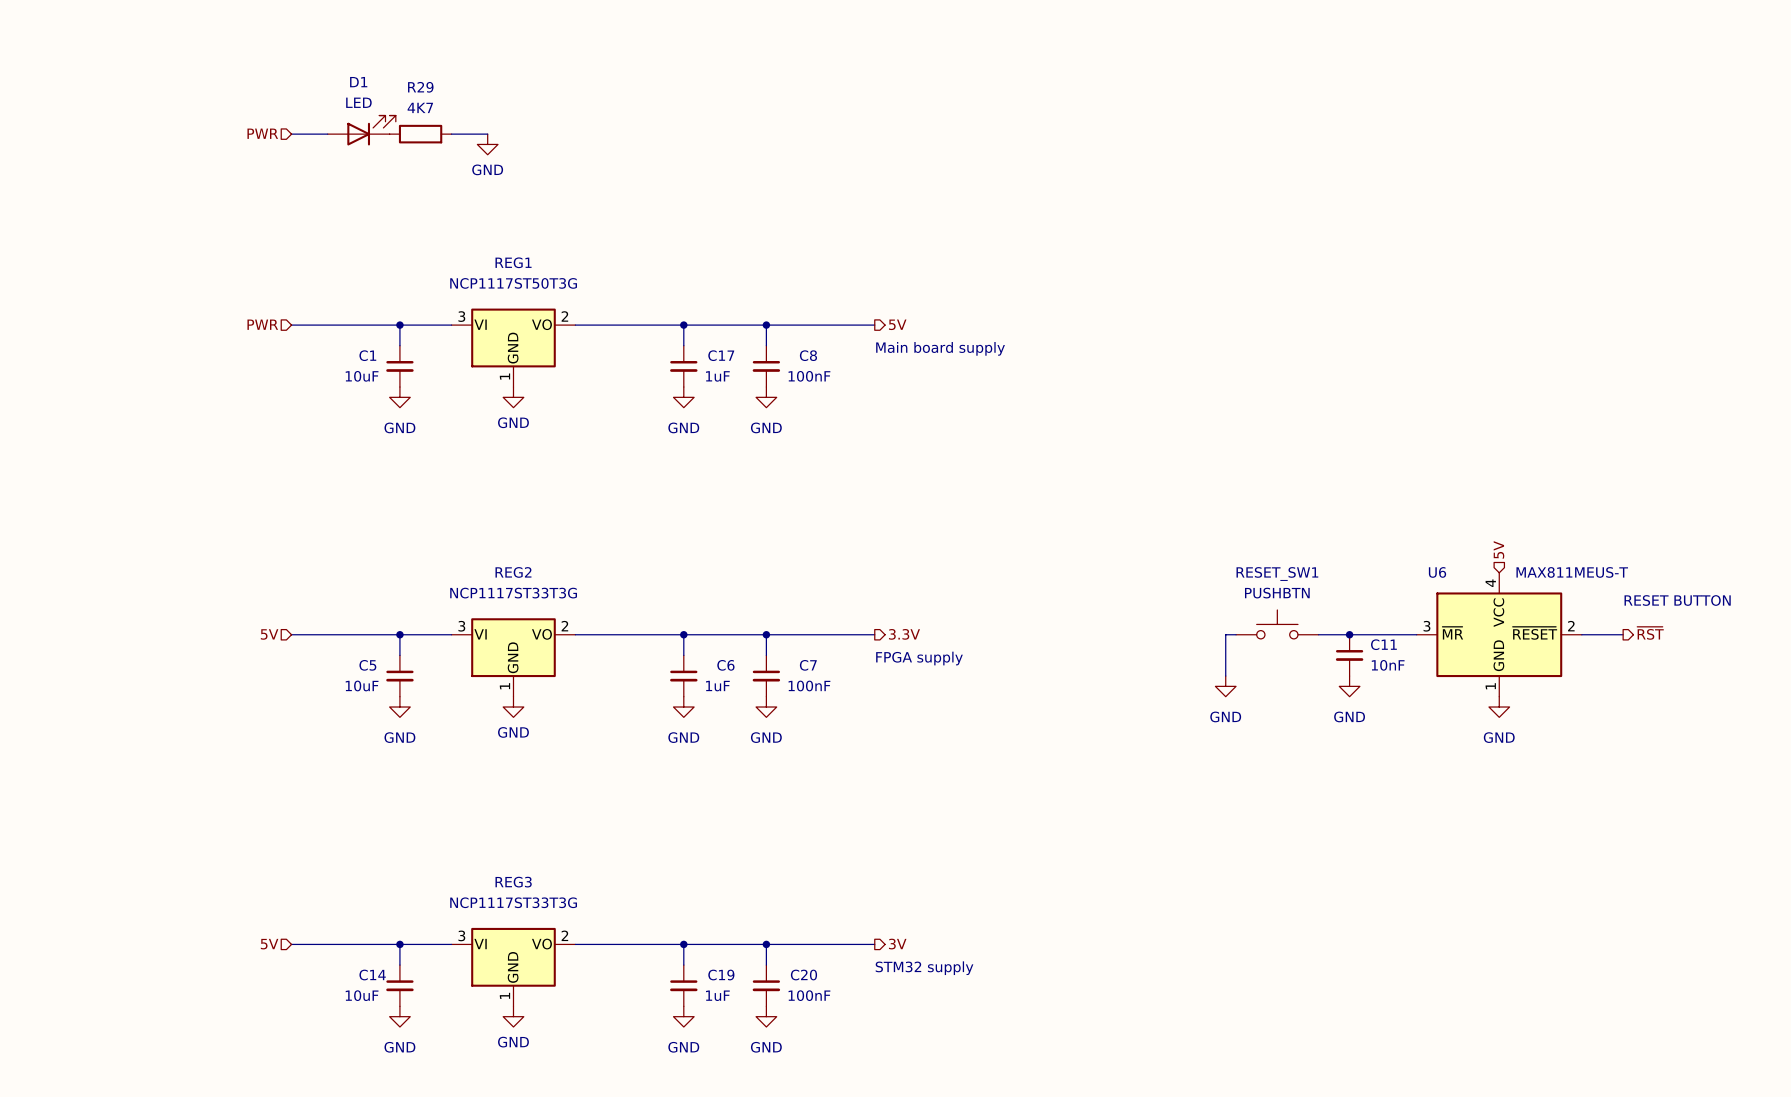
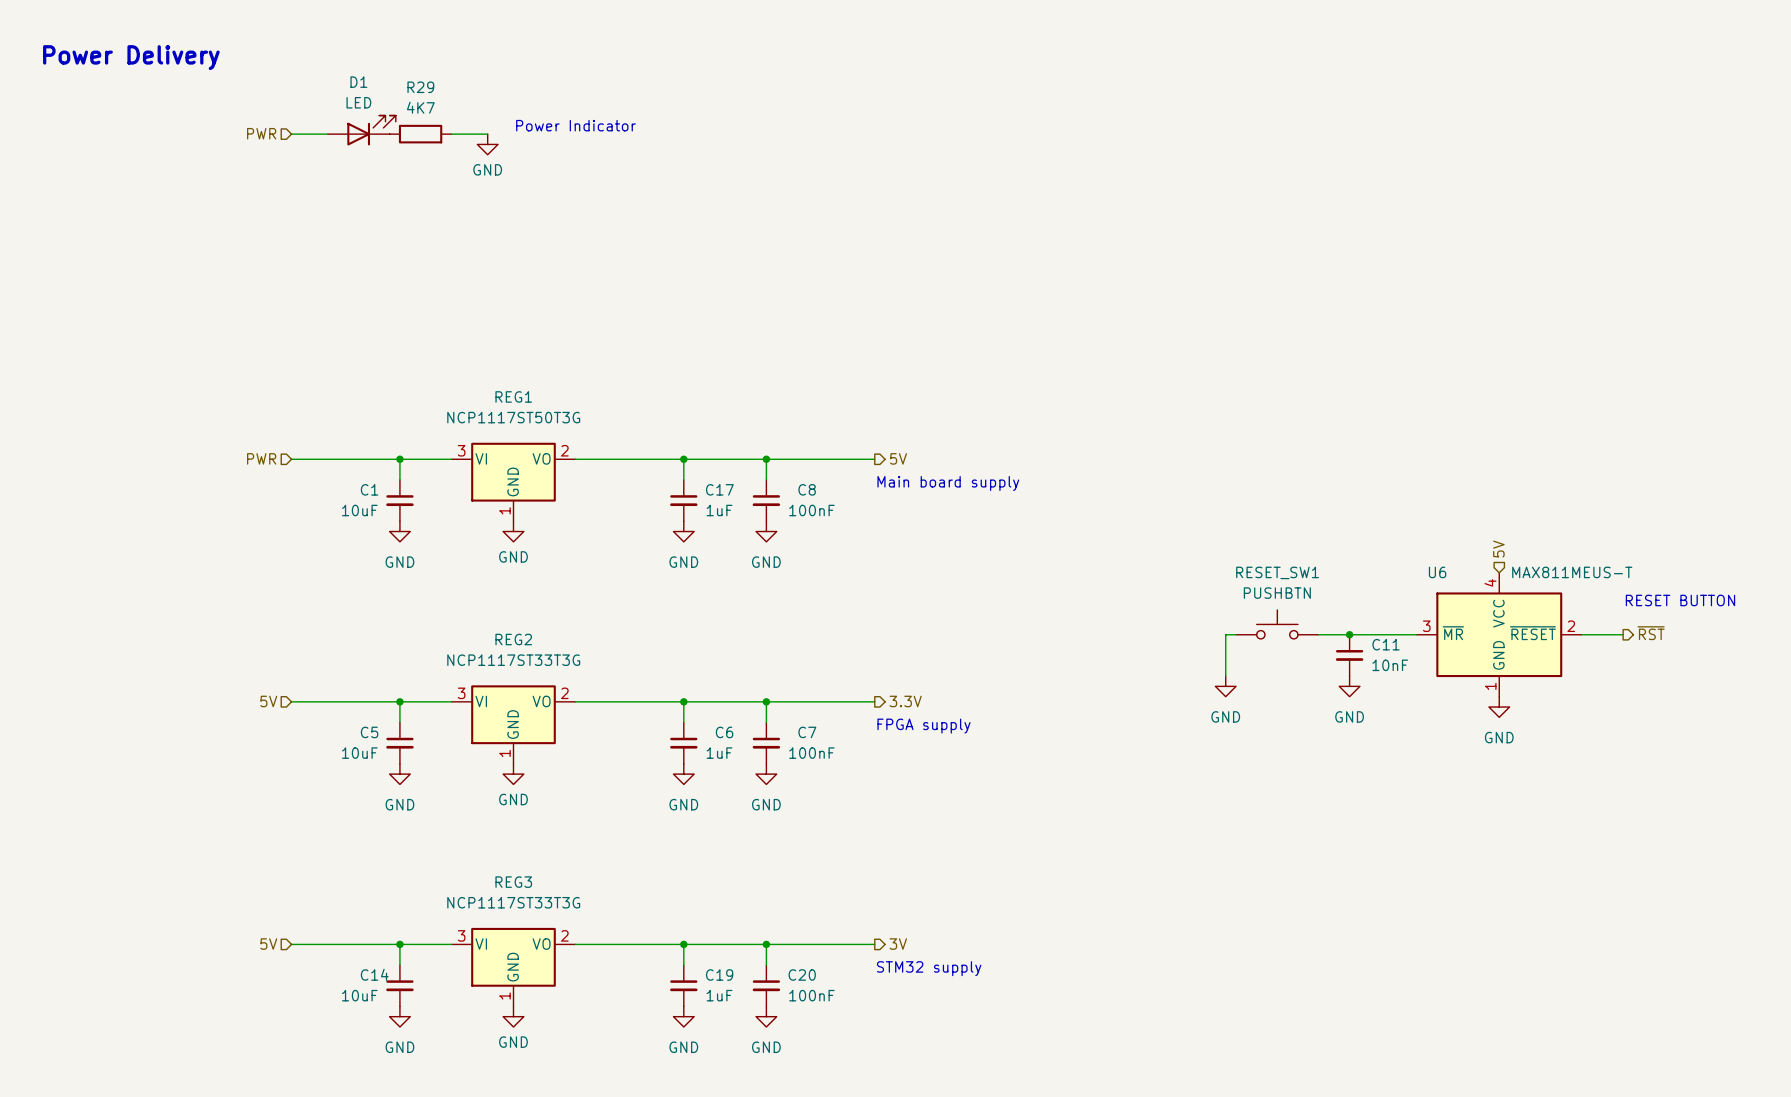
text: none -> Power Delivery (131, 57)
text: none -> Power Indicator (575, 125)
hierarchical label position: PWR (262, 324) -> PWR (261, 458)
hierarchical label position: 5V (897, 324) -> 5V (898, 458)
wire: (291, 325) (451, 325) -> (291, 459) (451, 459)
wire: (399, 325) (399, 345) -> (399, 459) (399, 479)
junction: (399, 325) -> none
wire: (575, 325) (874, 325) -> (575, 459) (874, 459)
wire: (683, 325) (683, 345) -> (683, 459) (683, 479)
junction: (683, 325) -> none
wire: (766, 325) (766, 345) -> (766, 459) (766, 479)
junction: (766, 325) -> none
REG1 position: (513, 347) -> (513, 481)
text position: Main board supply (940, 348) -> Main board supply (948, 483)
C1 position: (399, 366) -> (399, 500)
C17 position: (683, 366) -> (683, 500)
C8 position: (766, 366) -> (766, 500)
power symbol: GND (399, 397) -> none
power symbol: GND (513, 397) -> none
power symbol: GND (683, 397) -> none
power symbol: GND (766, 397) -> none
junction: none -> (399, 459)
junction: none -> (683, 459)
junction: none -> (766, 459)
power symbol: none -> GND (399, 531)
power symbol: none -> GND (513, 531)
power symbol: none -> GND (683, 531)
power symbol: none -> GND (766, 531)
hierarchical label position: 5V (269, 634) -> 5V (268, 701)
wire: (291, 634) (451, 634) -> (291, 701) (451, 701)
wire: (399, 634) (399, 655) -> (399, 701) (399, 722)
junction: (399, 634) -> none
wire: (575, 634) (874, 634) -> (575, 701) (874, 701)
wire: (683, 634) (683, 655) -> (683, 701) (683, 722)
junction: (683, 634) -> none
wire: (766, 634) (766, 655) -> (766, 701) (766, 722)
junction: (766, 634) -> none
hierarchical label position: 3.3V (904, 634) -> 3.3V (905, 701)
REG2 position: (513, 657) -> (513, 724)
text position: FPGA supply (919, 658) -> FPGA supply (924, 726)
C5 position: (399, 676) -> (399, 743)
C6 position: (683, 676) -> (683, 743)
C7 position: (766, 676) -> (766, 743)
junction: none -> (399, 701)
junction: none -> (683, 701)
junction: none -> (766, 701)
power symbol: GND (399, 707) -> none
power symbol: GND (513, 707) -> none
power symbol: GND (683, 707) -> none
power symbol: GND (766, 707) -> none
power symbol: none -> GND (399, 774)
power symbol: none -> GND (513, 774)
power symbol: none -> GND (683, 774)
power symbol: none -> GND (766, 774)

